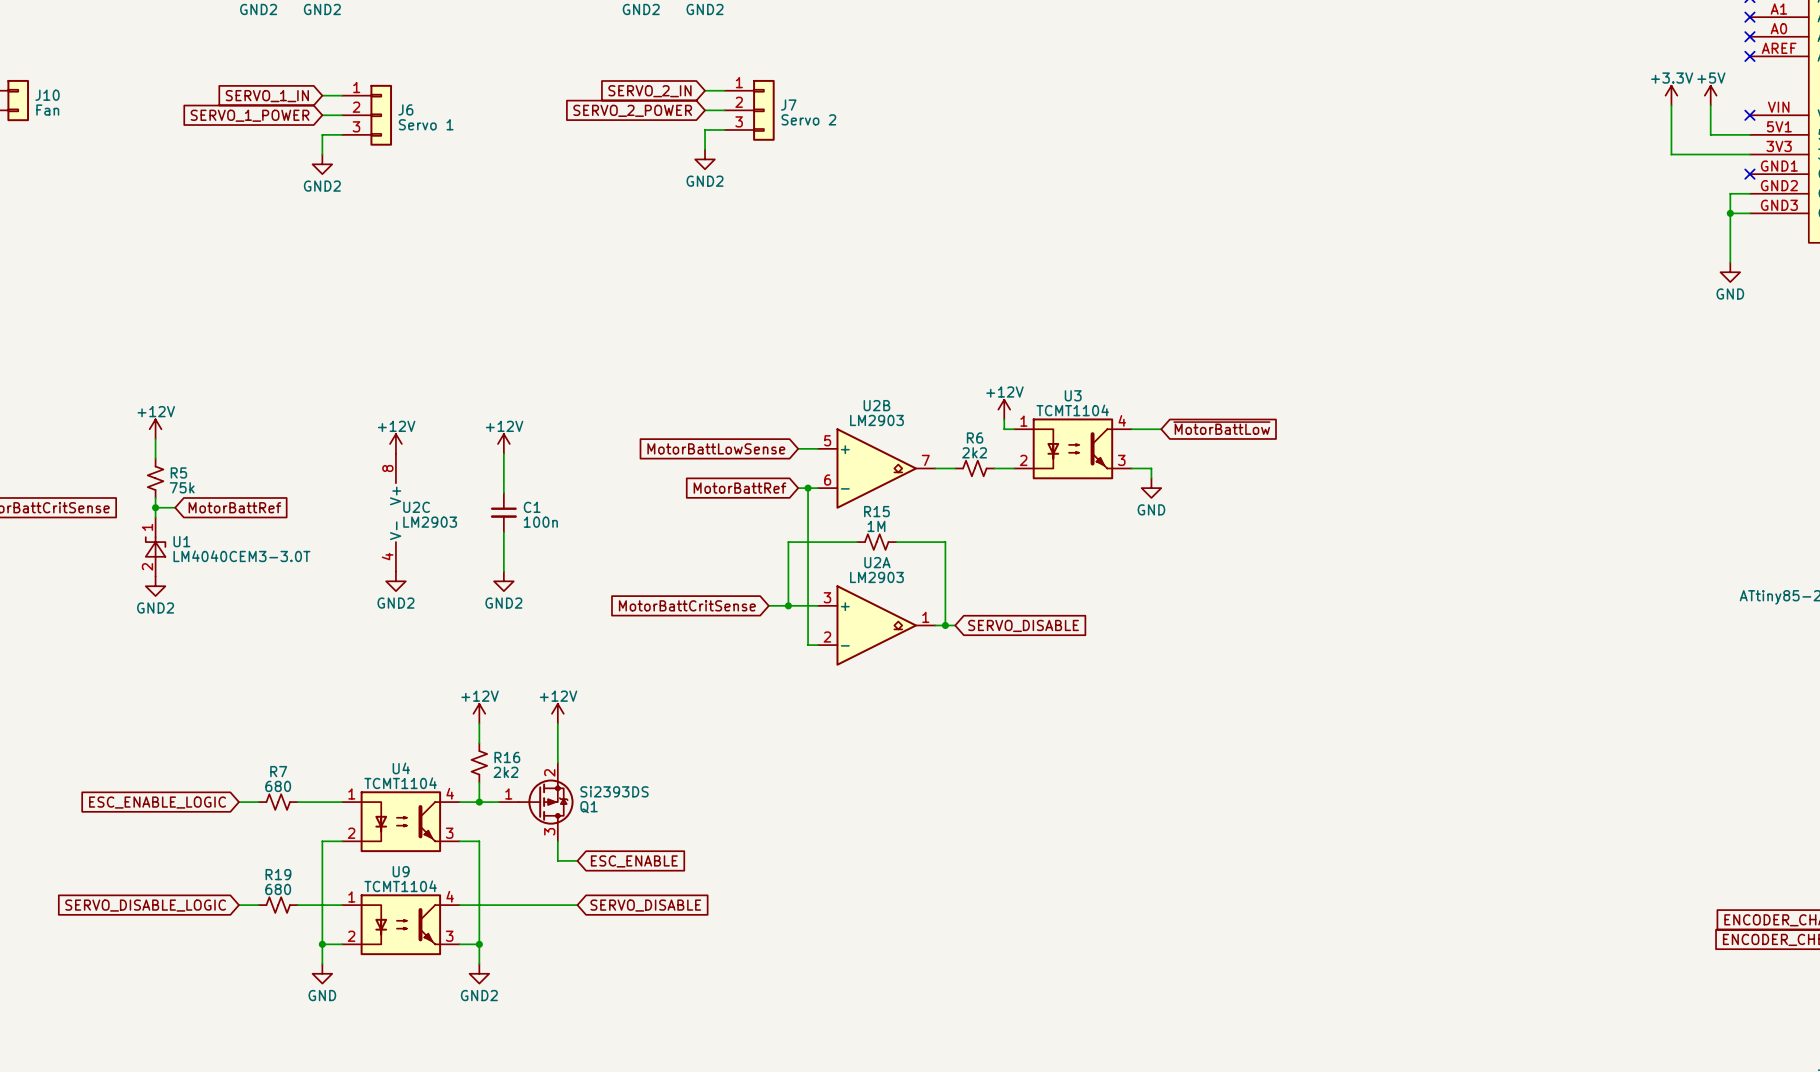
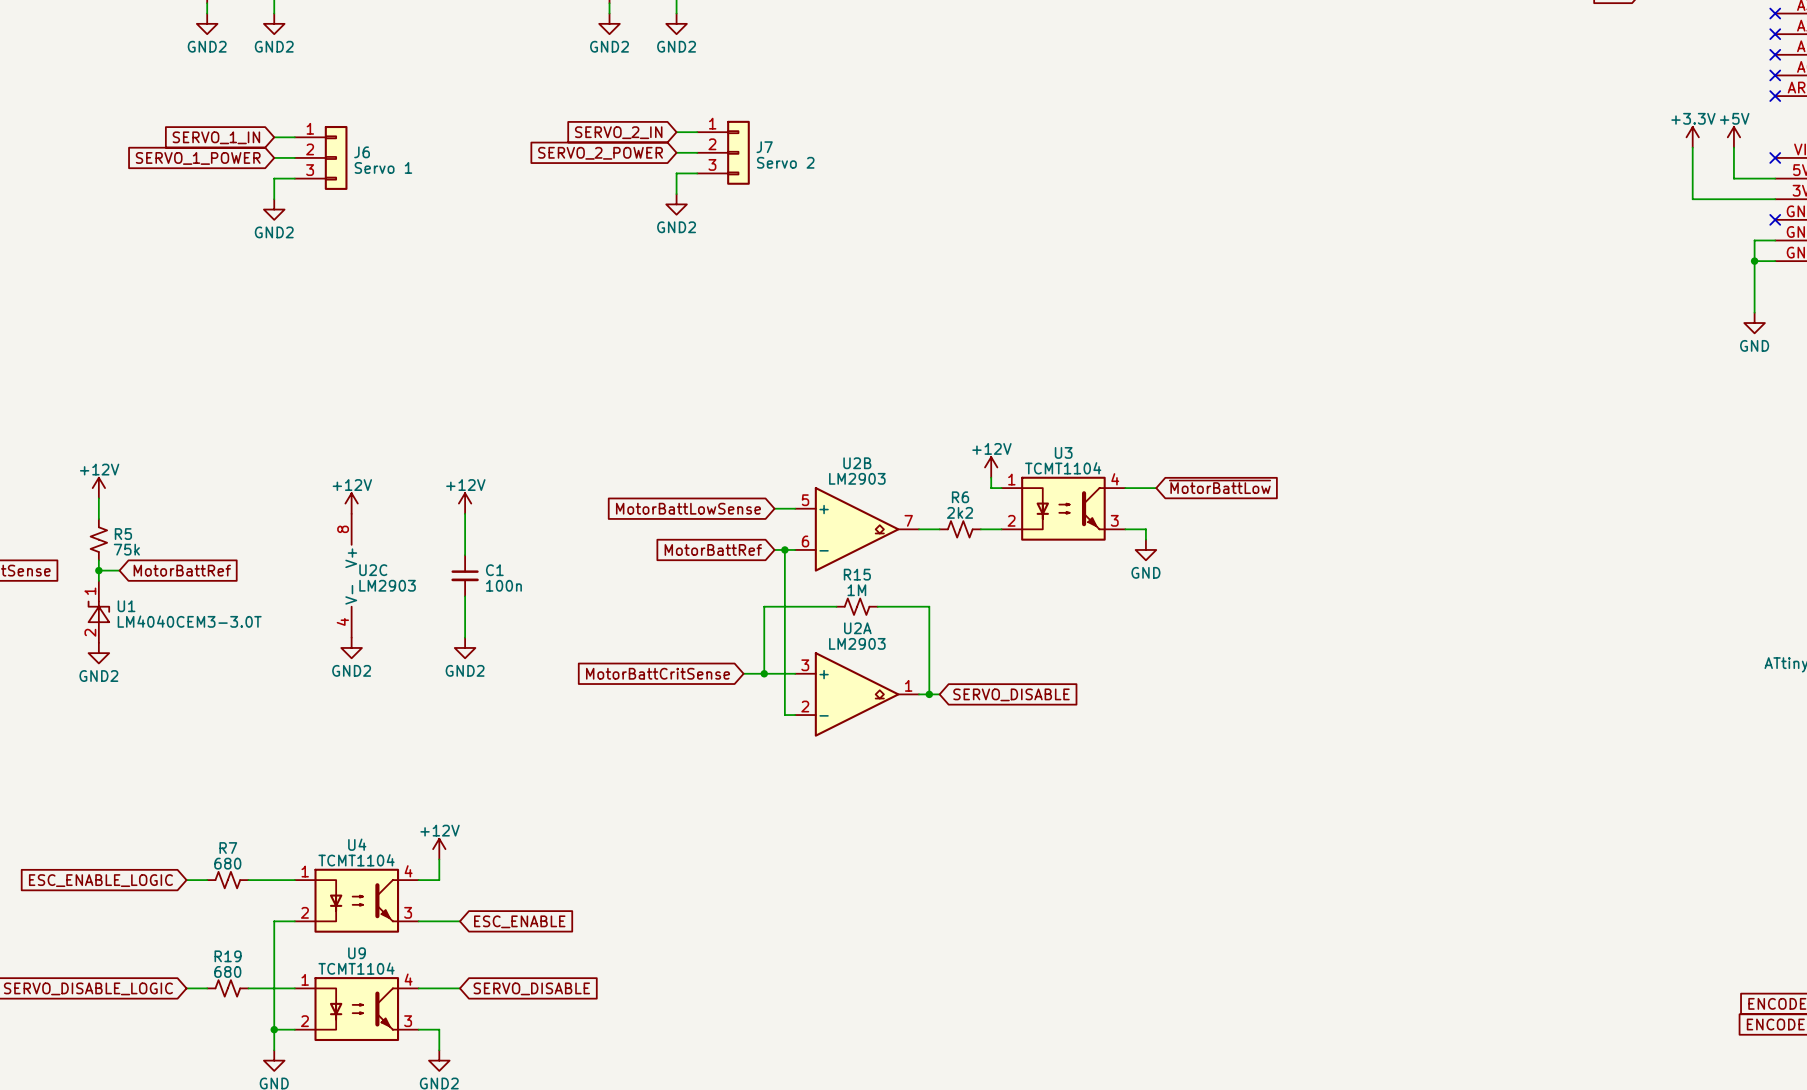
power symbol: +12V (479, 713) -> none
power symbol: +12V (557, 713) -> none
wire: (479, 723) (479, 743) -> none
wire: (557, 723) (557, 762) -> none
R16: 2k2 (479, 762) -> none
power symbol: none -> +12V (439, 849)
wire: (479, 802) (498, 802) -> none
junction: (479, 802) -> none
Q1: Si2393DS (536, 802) -> none
wire: (479, 841) (479, 944) -> (439, 921) (459, 921)
wire: (557, 841) (557, 860) (577, 860) -> none
global label position: ESC_ENABLE (634, 861) -> ESC_ENABLE (519, 921)
wire: (498, 905) (577, 905) -> none
global label position: SERVO_DISABLE (645, 905) -> SERVO_DISABLE (531, 988)
junction: (479, 944) -> none

